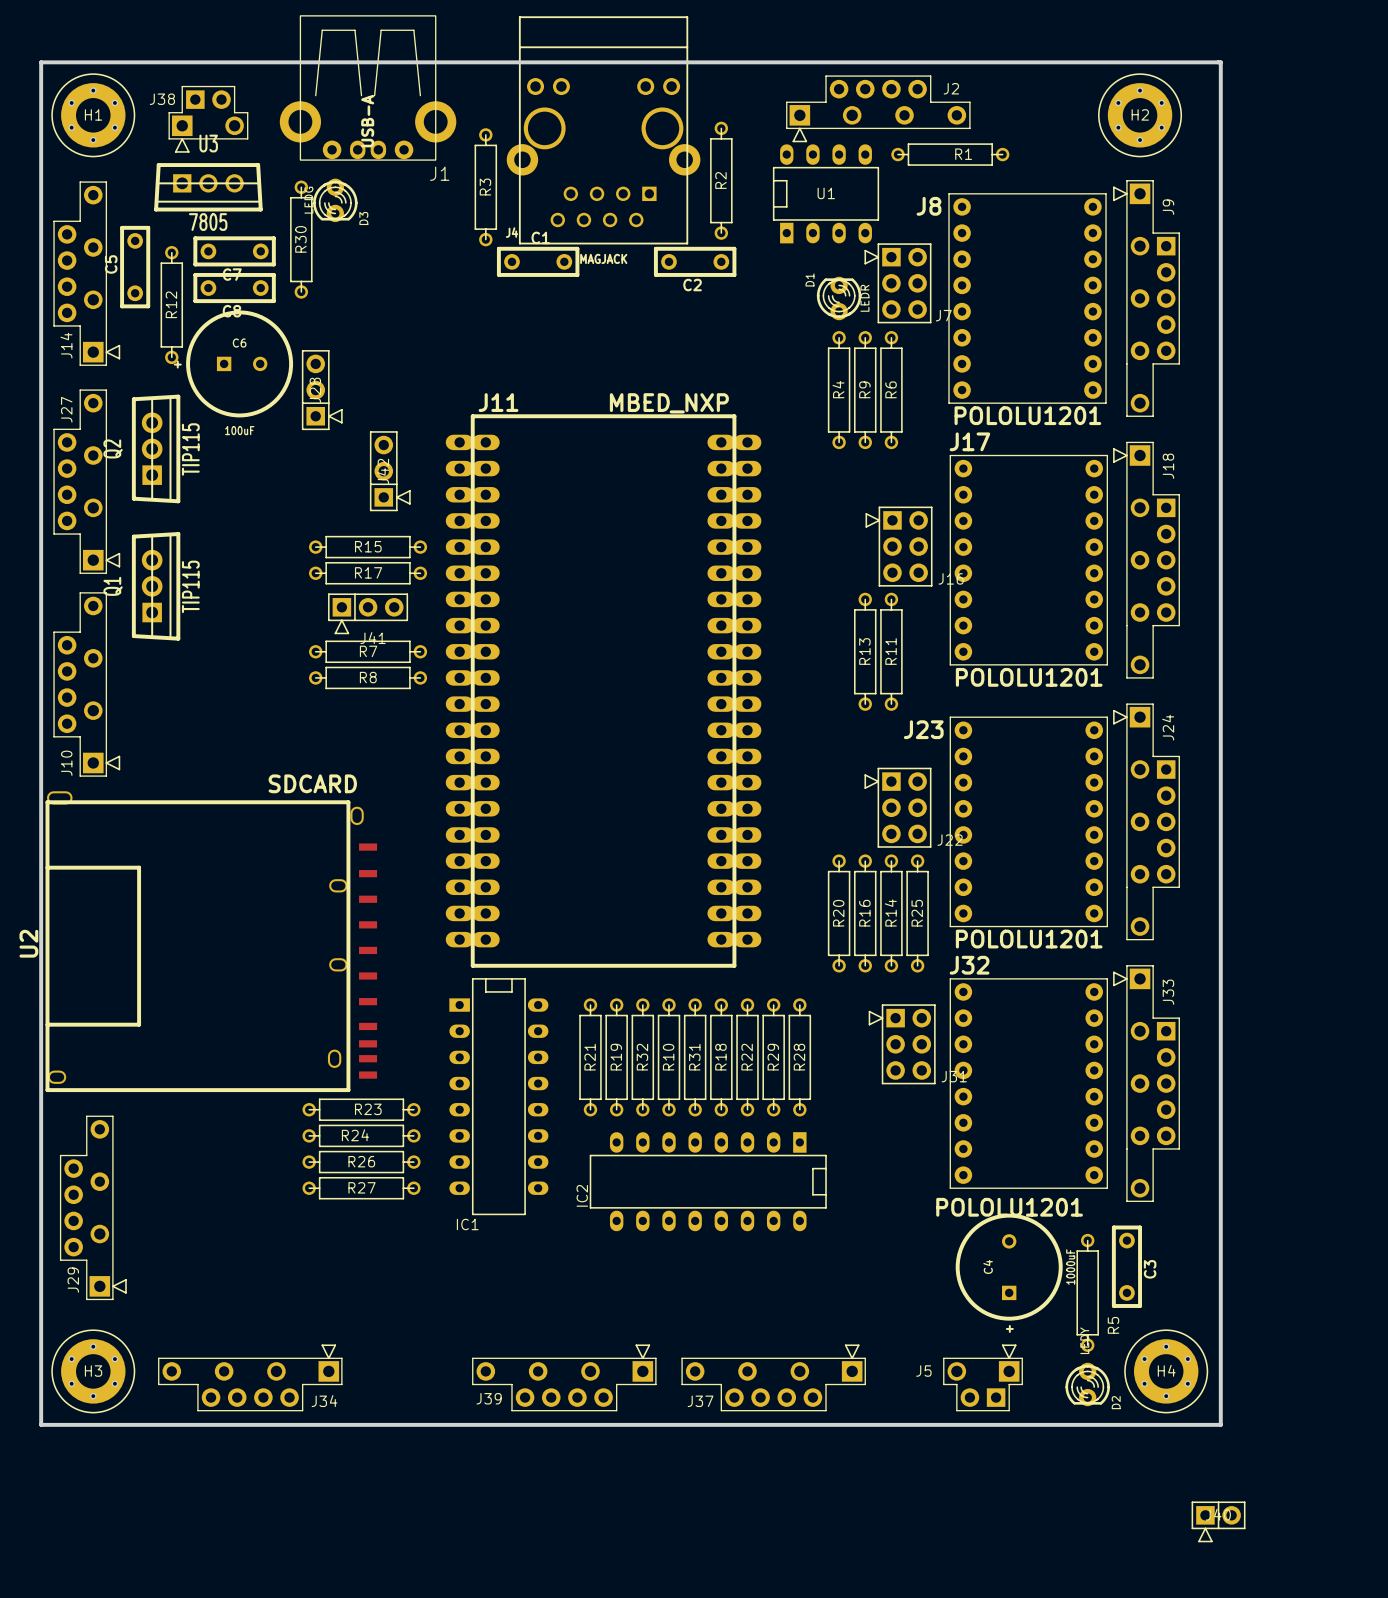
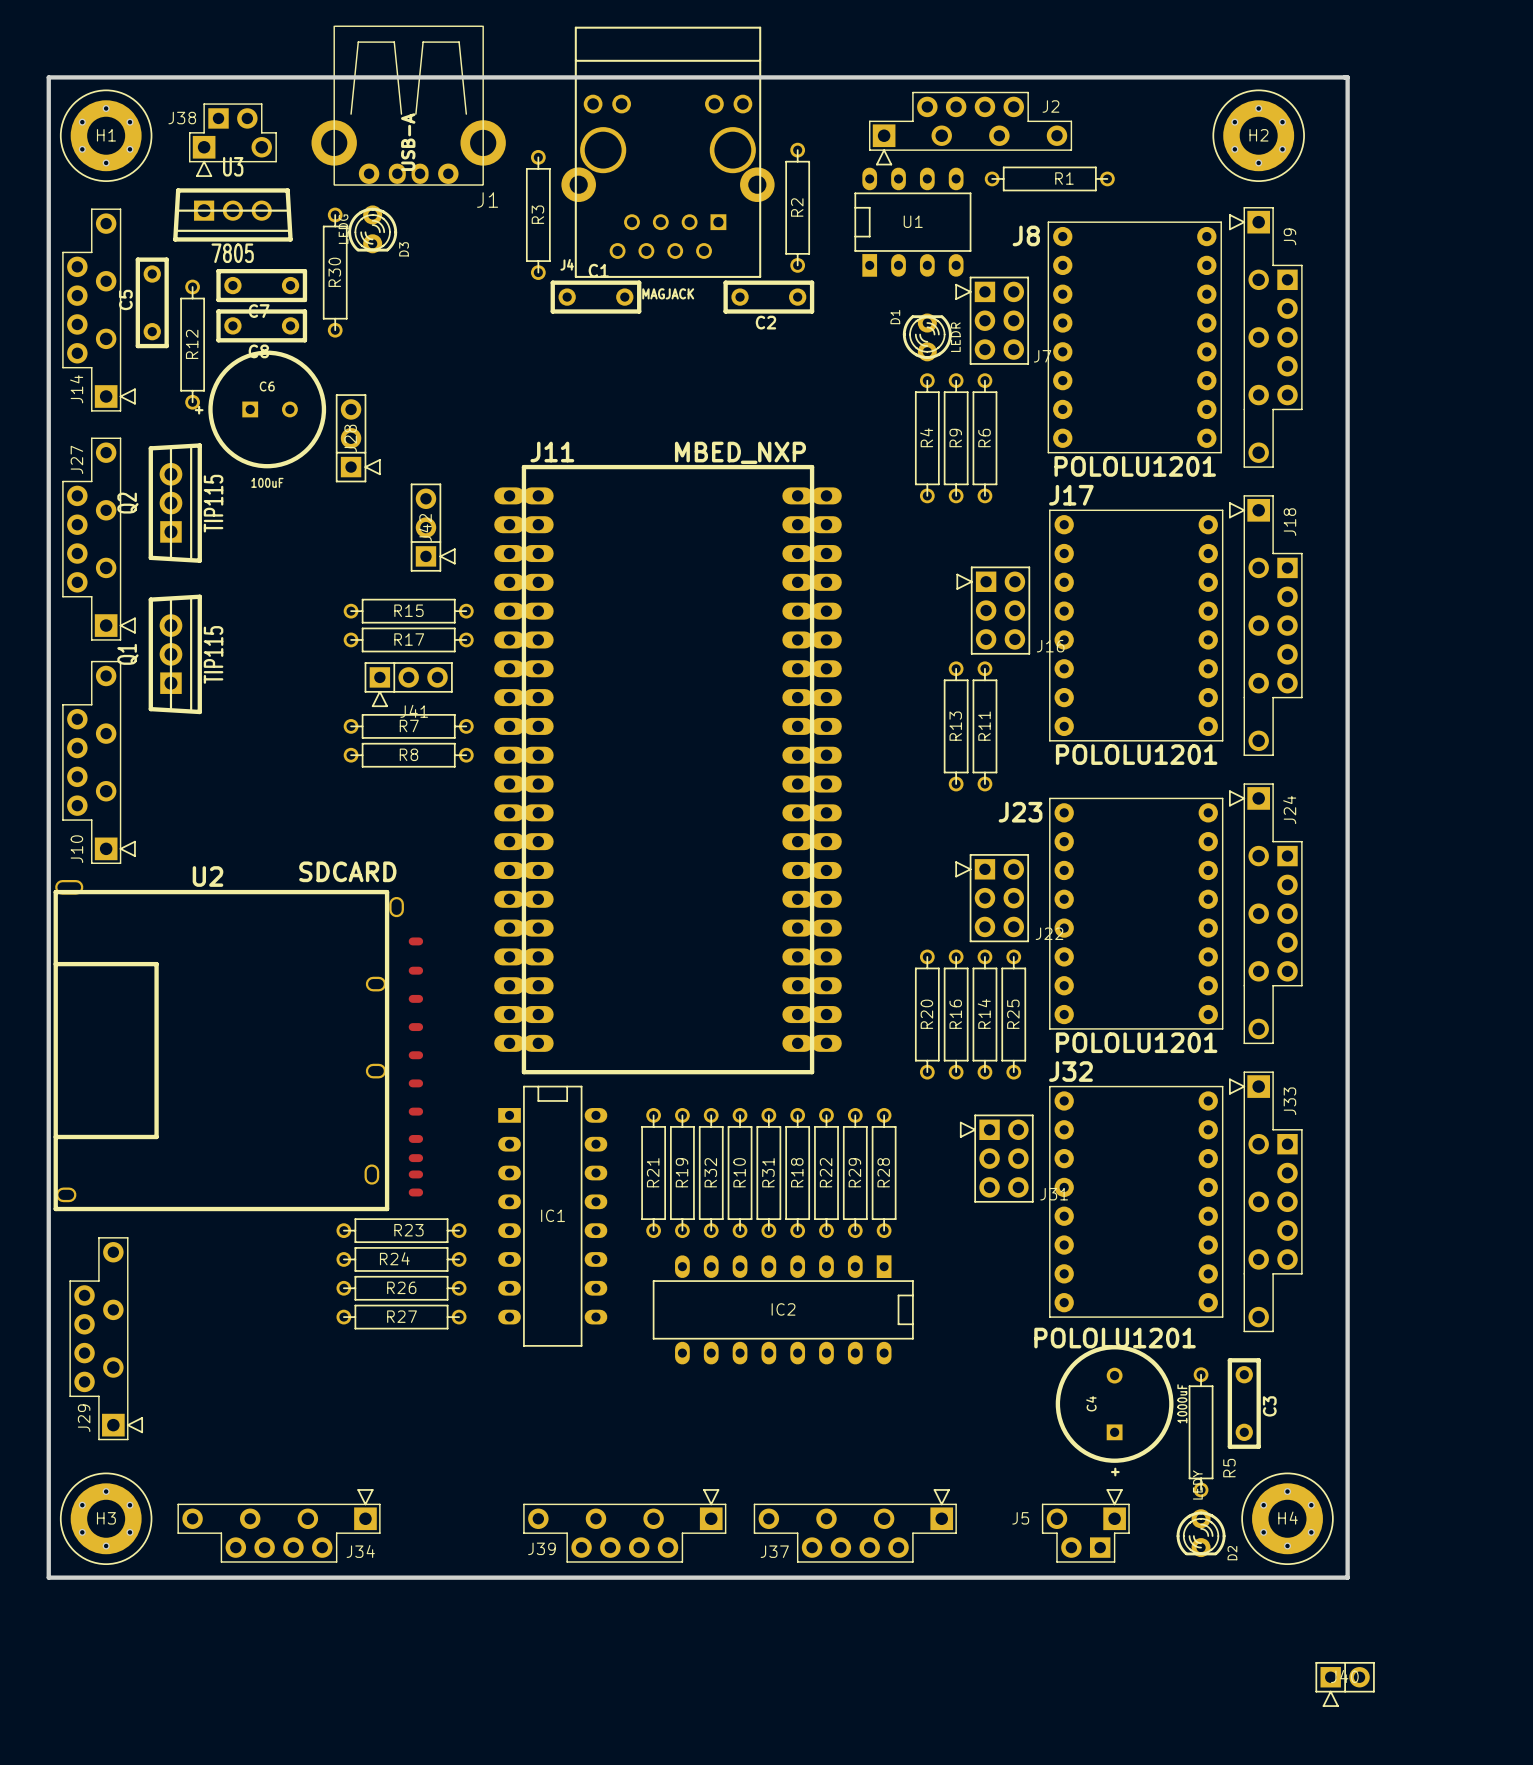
U2 footprint: [45, 791, 378, 1093] -> [53, 879, 424, 1212]
U2 name position: U2 (28, 943) -> U2 (207, 876)
IC2 name rotation: 0° (582, 1195) -> 90° clockwise (783, 1309)
IC2 name position: IC2 (582, 1195) -> IC2 (783, 1309)
IC1 name position: IC1 (467, 1224) -> IC1 (553, 1215)

